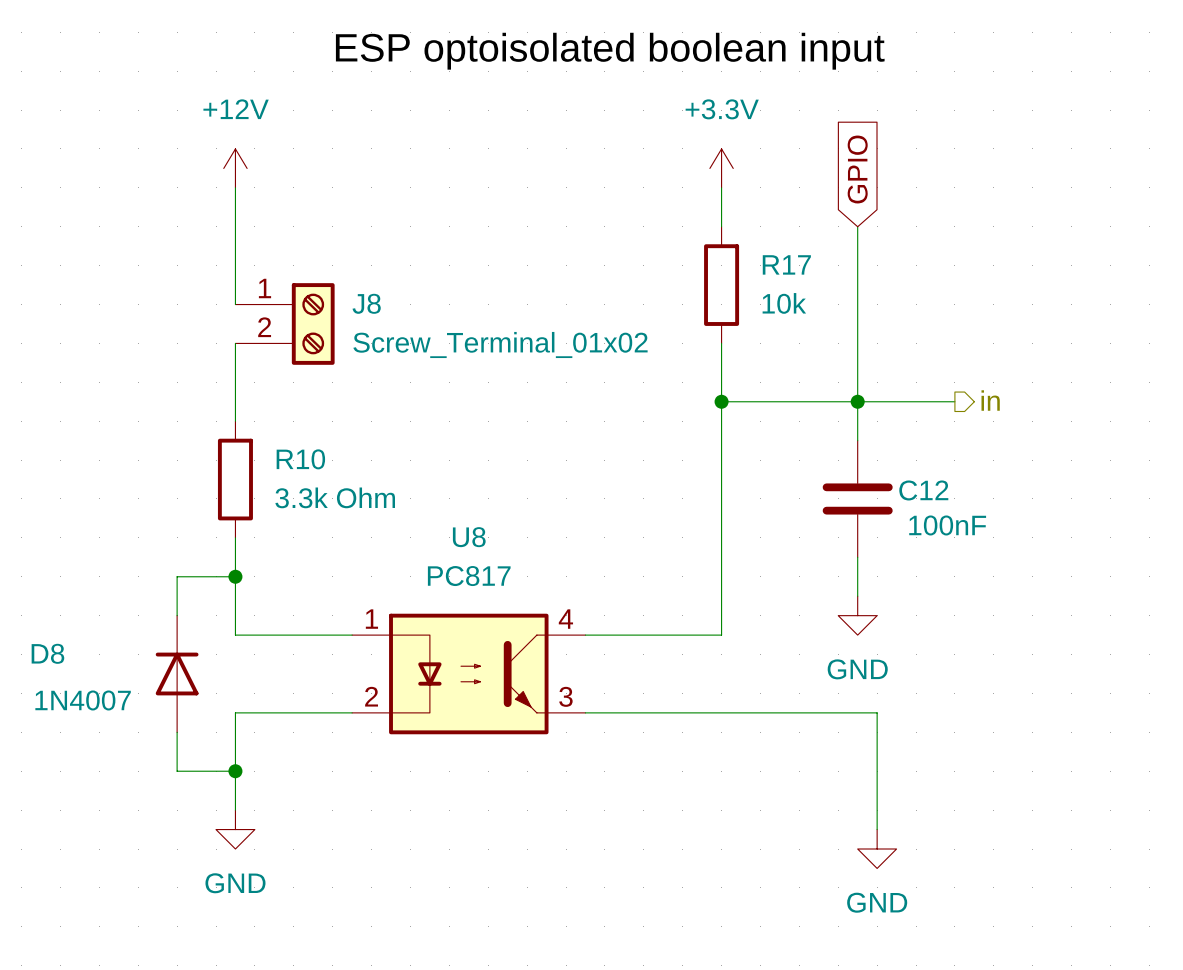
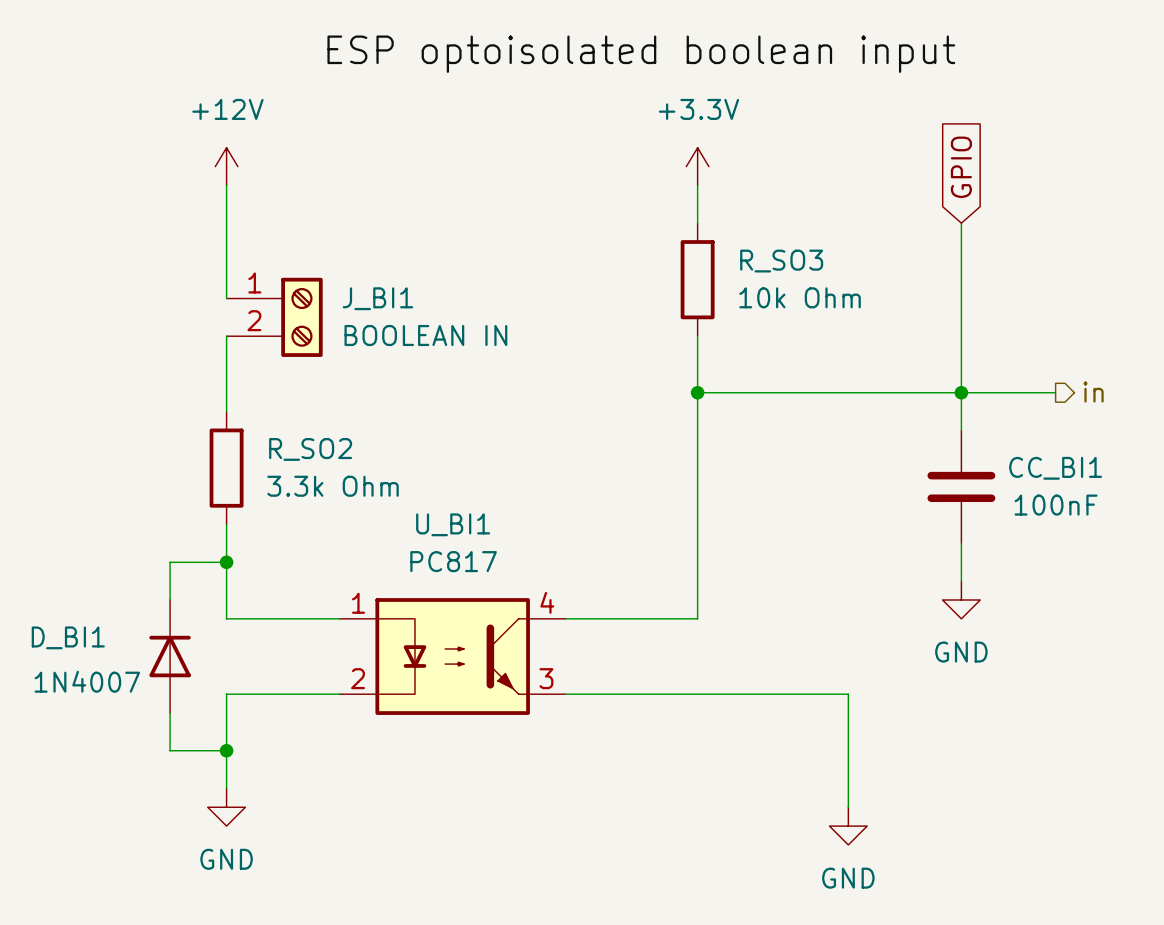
global label position: GPIO (857, 169) -> GPIO (961, 167)
wire: (857, 226) (857, 440) -> (961, 223) (961, 430)
R17 name: R17 (786, 264) -> R_SO3 (781, 261)
J8 name: J8 (366, 303) -> J_BI1 (377, 298)
R17 value: 10k (784, 303) -> 10k Ohm (800, 297)
J8 value: Screw_Terminal_01x02 (500, 344) -> BOOLEAN IN (425, 335)
hierarchical label position: in (990, 400) -> in (1093, 392)
junction: (857, 401) -> none
wire: none -> (923, 392) (1055, 392)
junction: none -> (961, 392)
R10 name: R10 (300, 459) -> R_SO2 (310, 449)
C12: 100nF (857, 498) -> none
CC_BI1: none -> 100nF (961, 486)
U8 name: U8 (469, 537) -> U_BI1 (453, 524)
wire: (857, 557) (857, 596) -> (961, 543) (961, 581)
power symbol position: GND (857, 615) -> GND (961, 599)
D8 name: D8 (47, 653) -> D_BI1 (68, 637)

